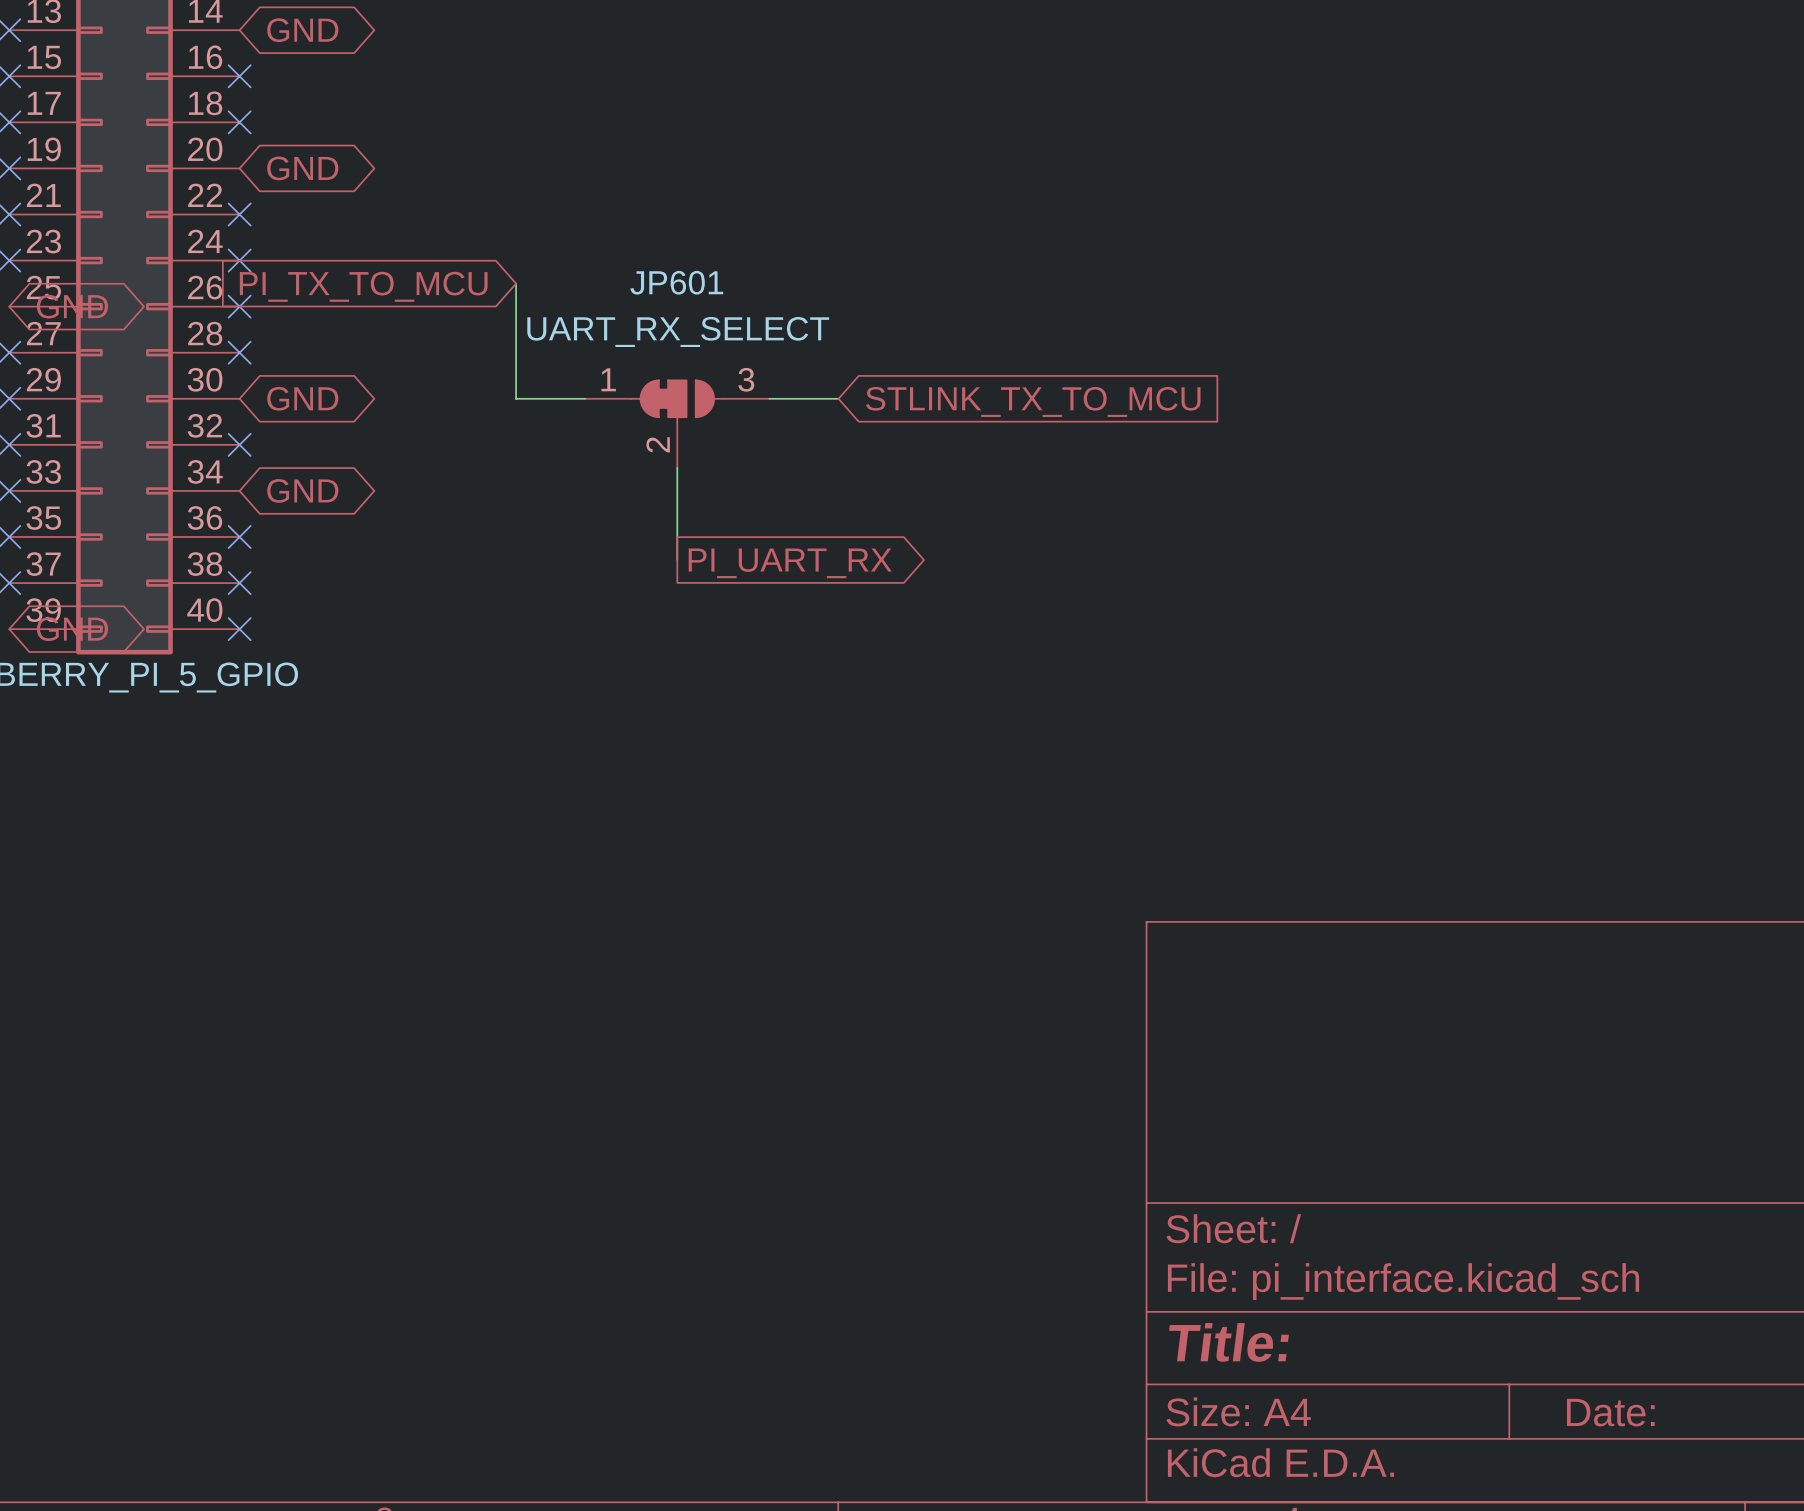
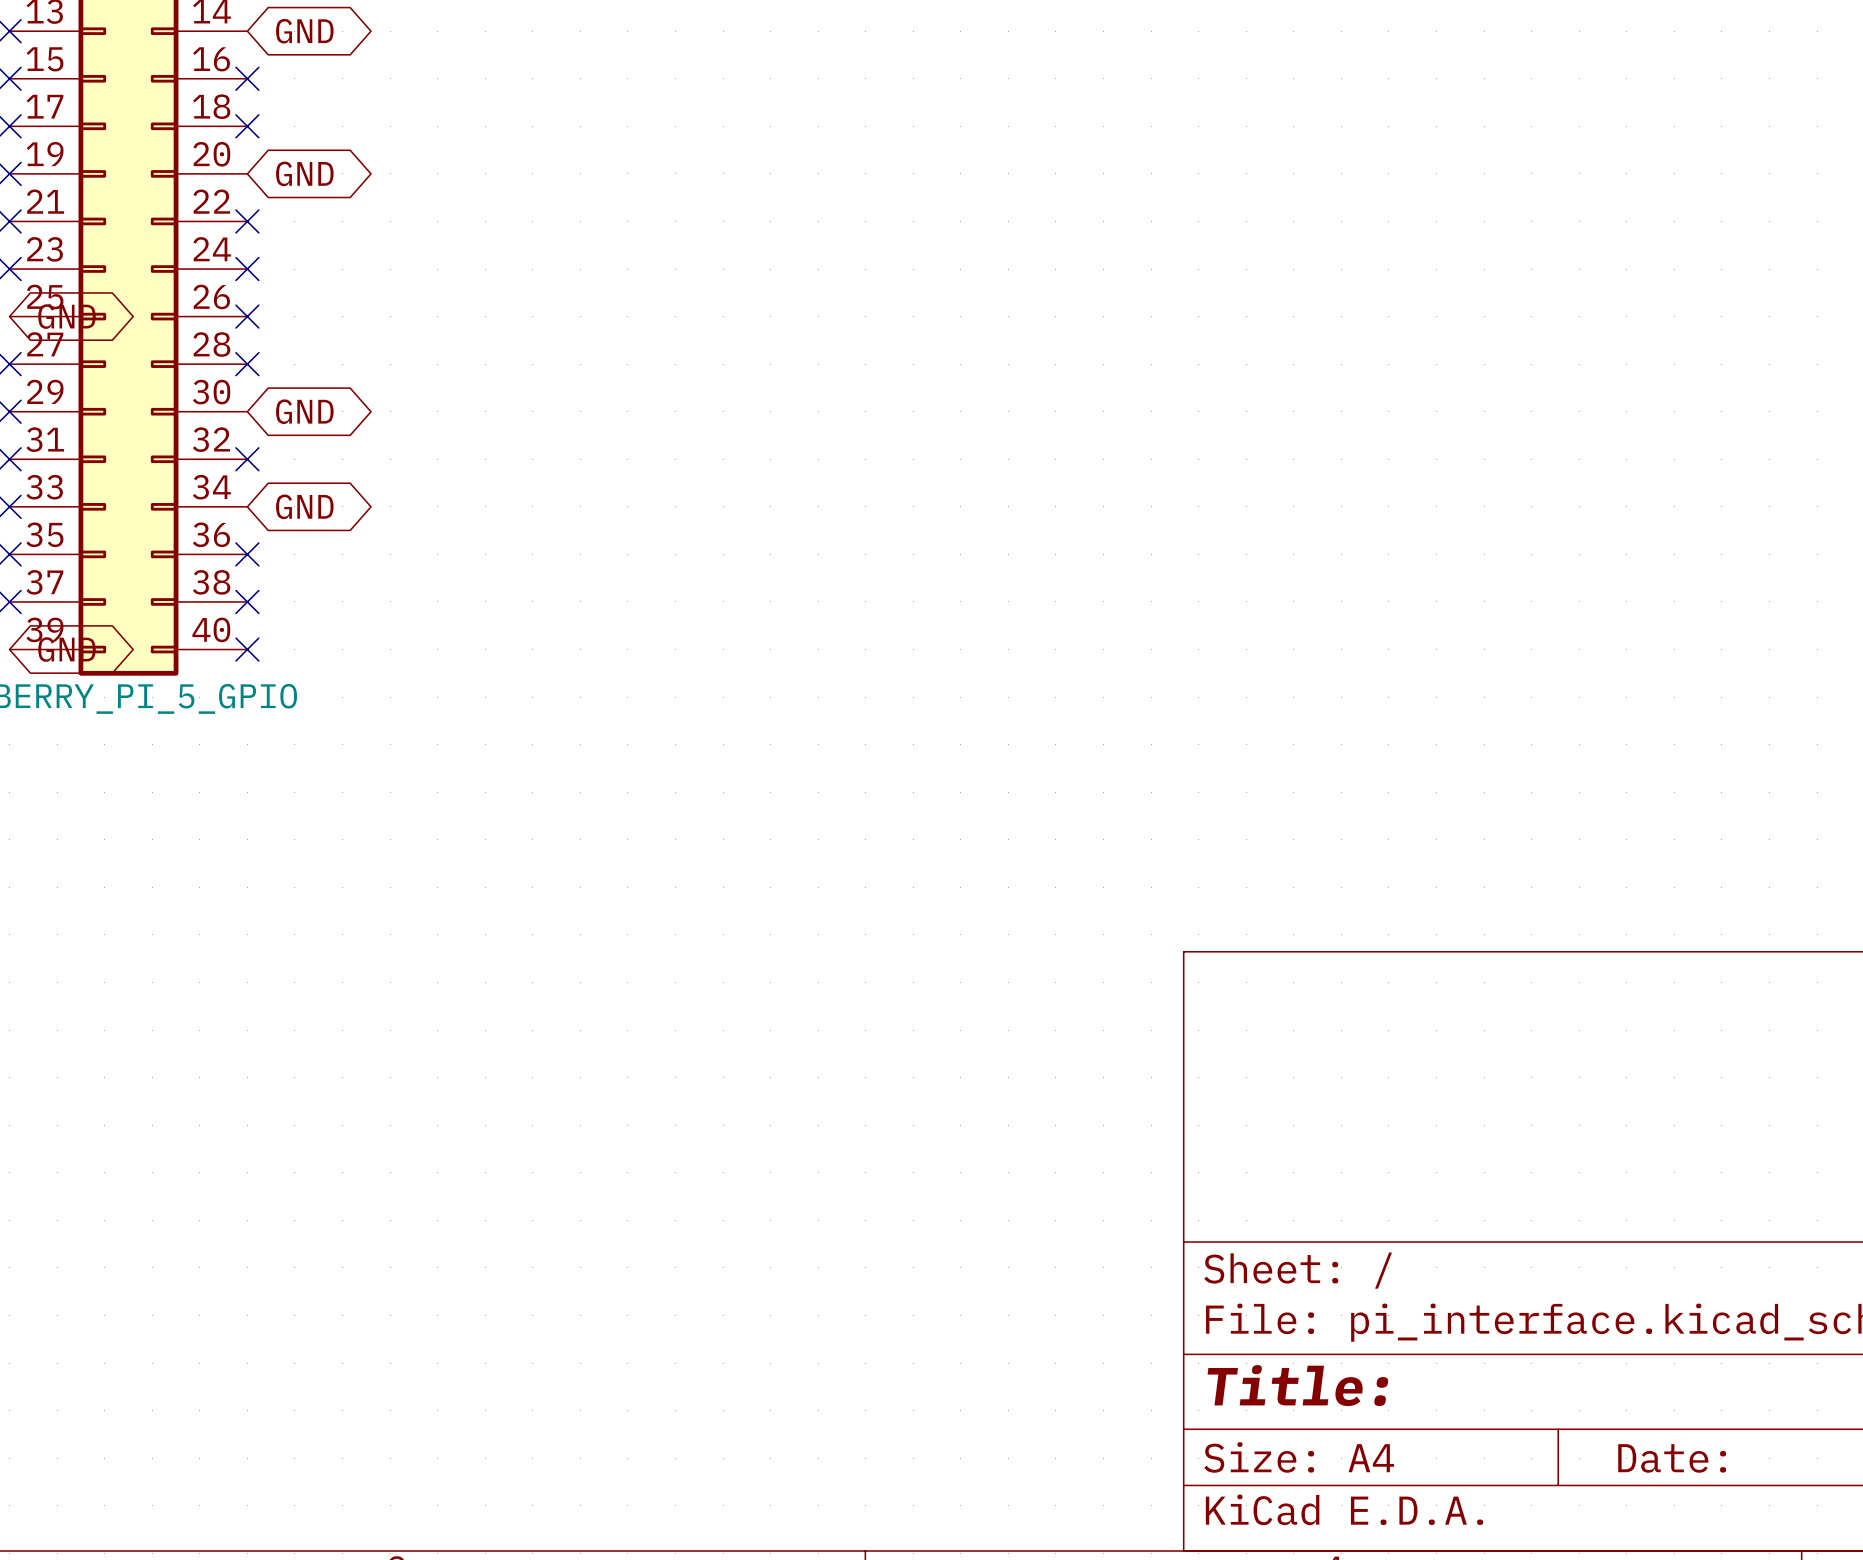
wire: (516, 283) (516, 398) (585, 398) -> none
global label: PI_TX_TO_MCU (363, 286) -> none
wire: (769, 398) (838, 398) -> none
global label: STLINK_TX_TO_MCU (1033, 401) -> none
JP601: UART_RX_SELECT (677, 424) -> none
wire: (677, 467) (677, 560) -> none
global label: PI_UART_RX (790, 563) -> none

